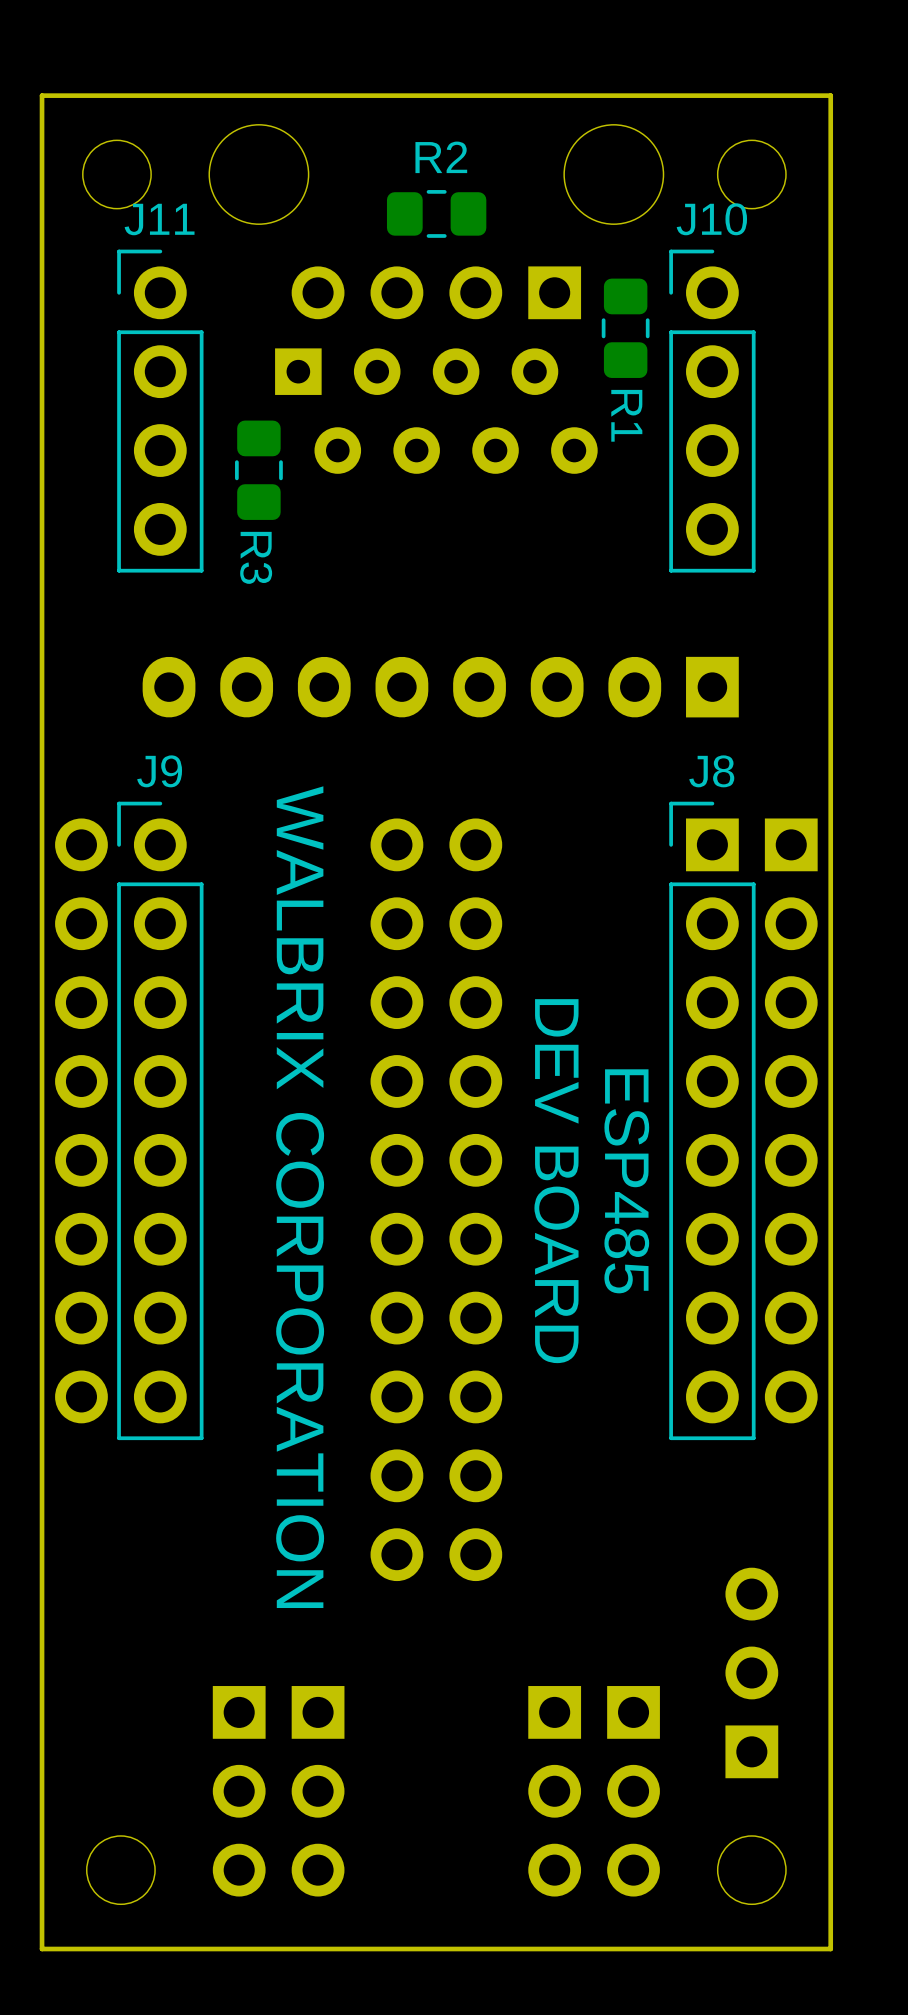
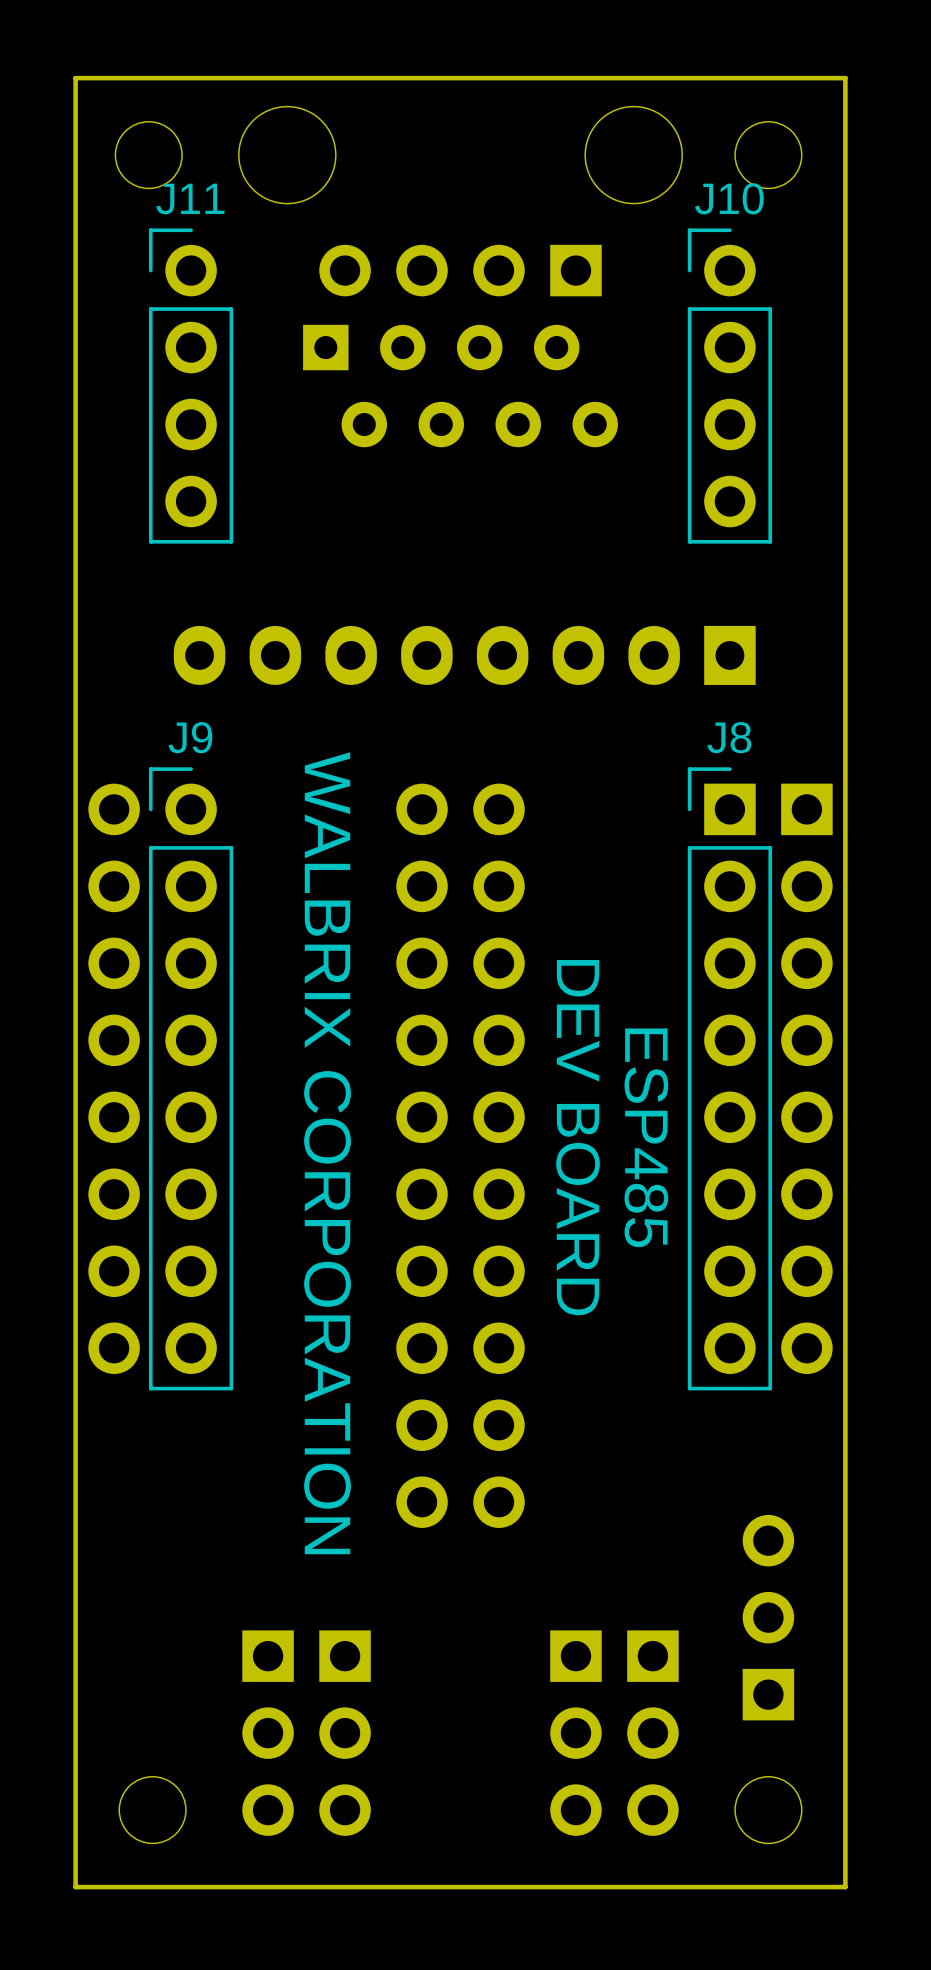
R2: (436, 213) -> none
R1: (625, 328) -> none
R3: (258, 470) -> none

